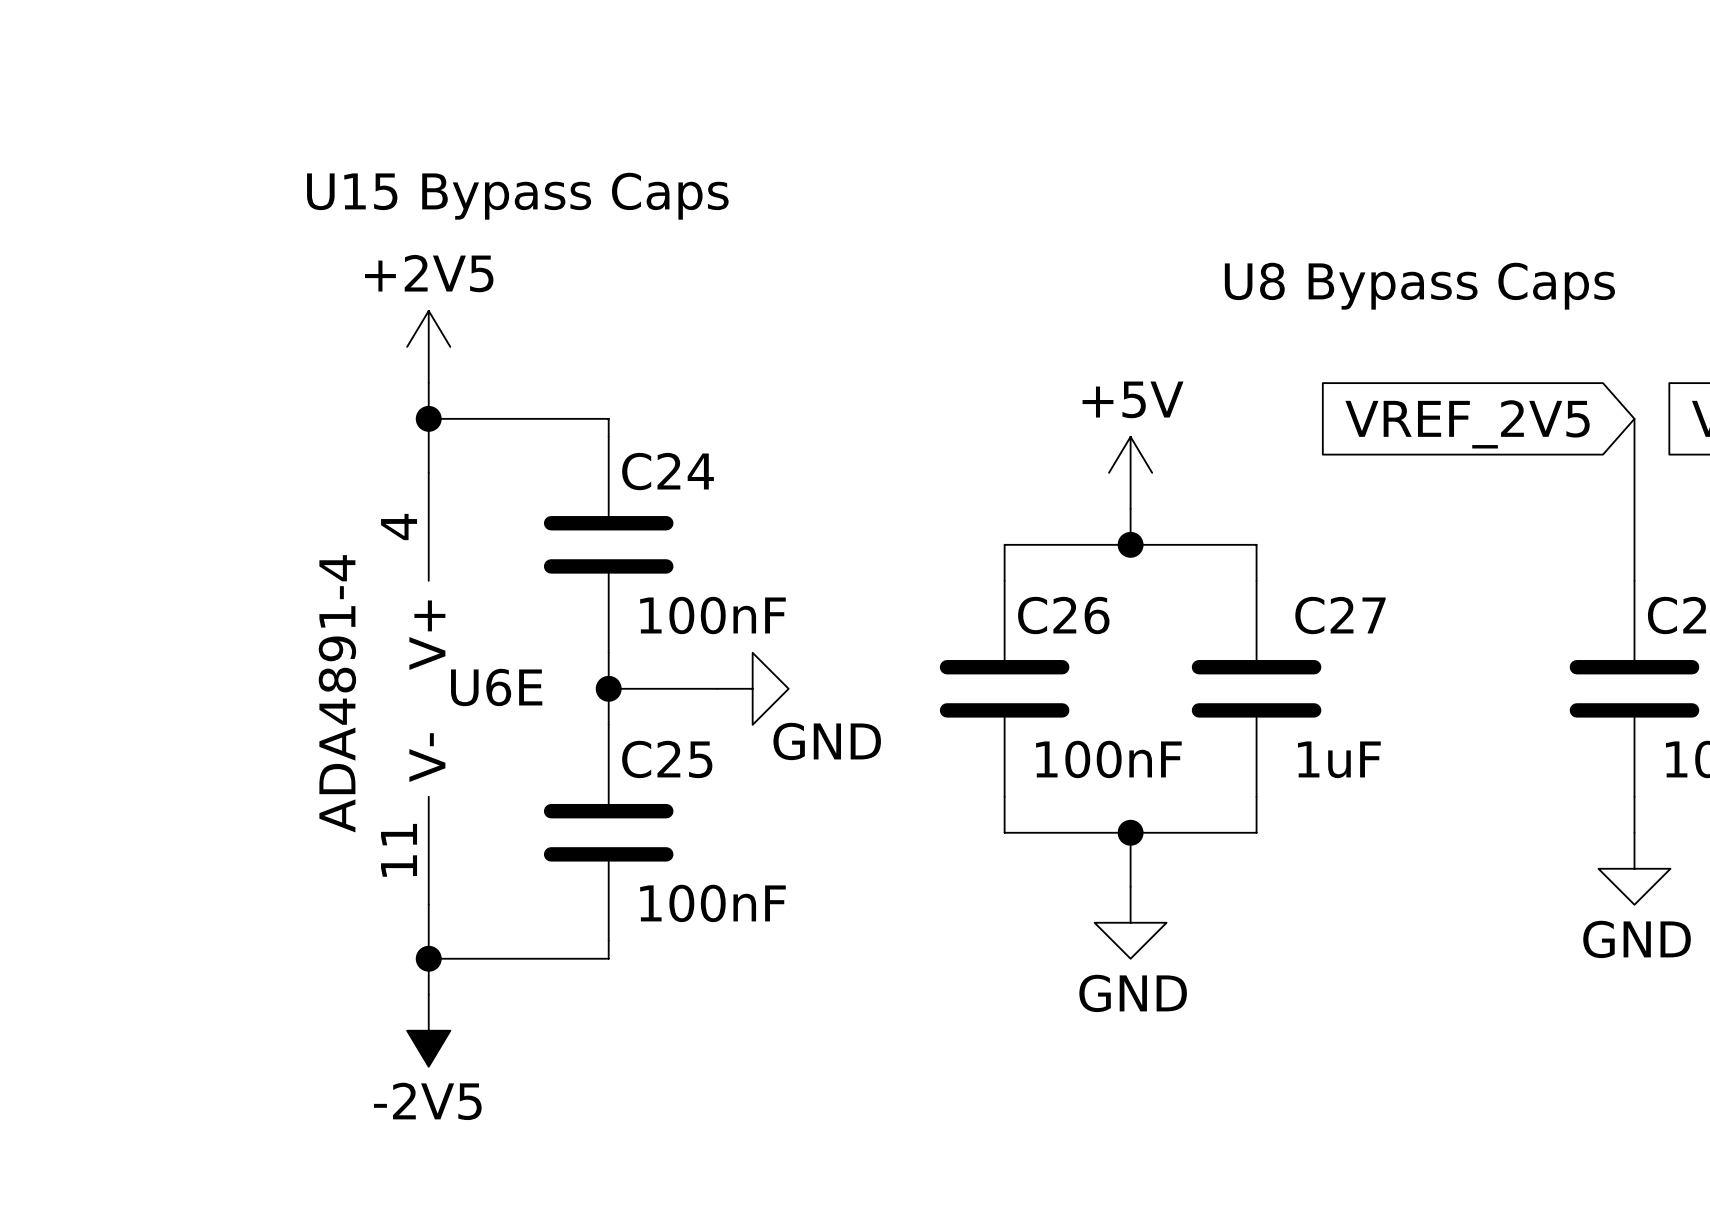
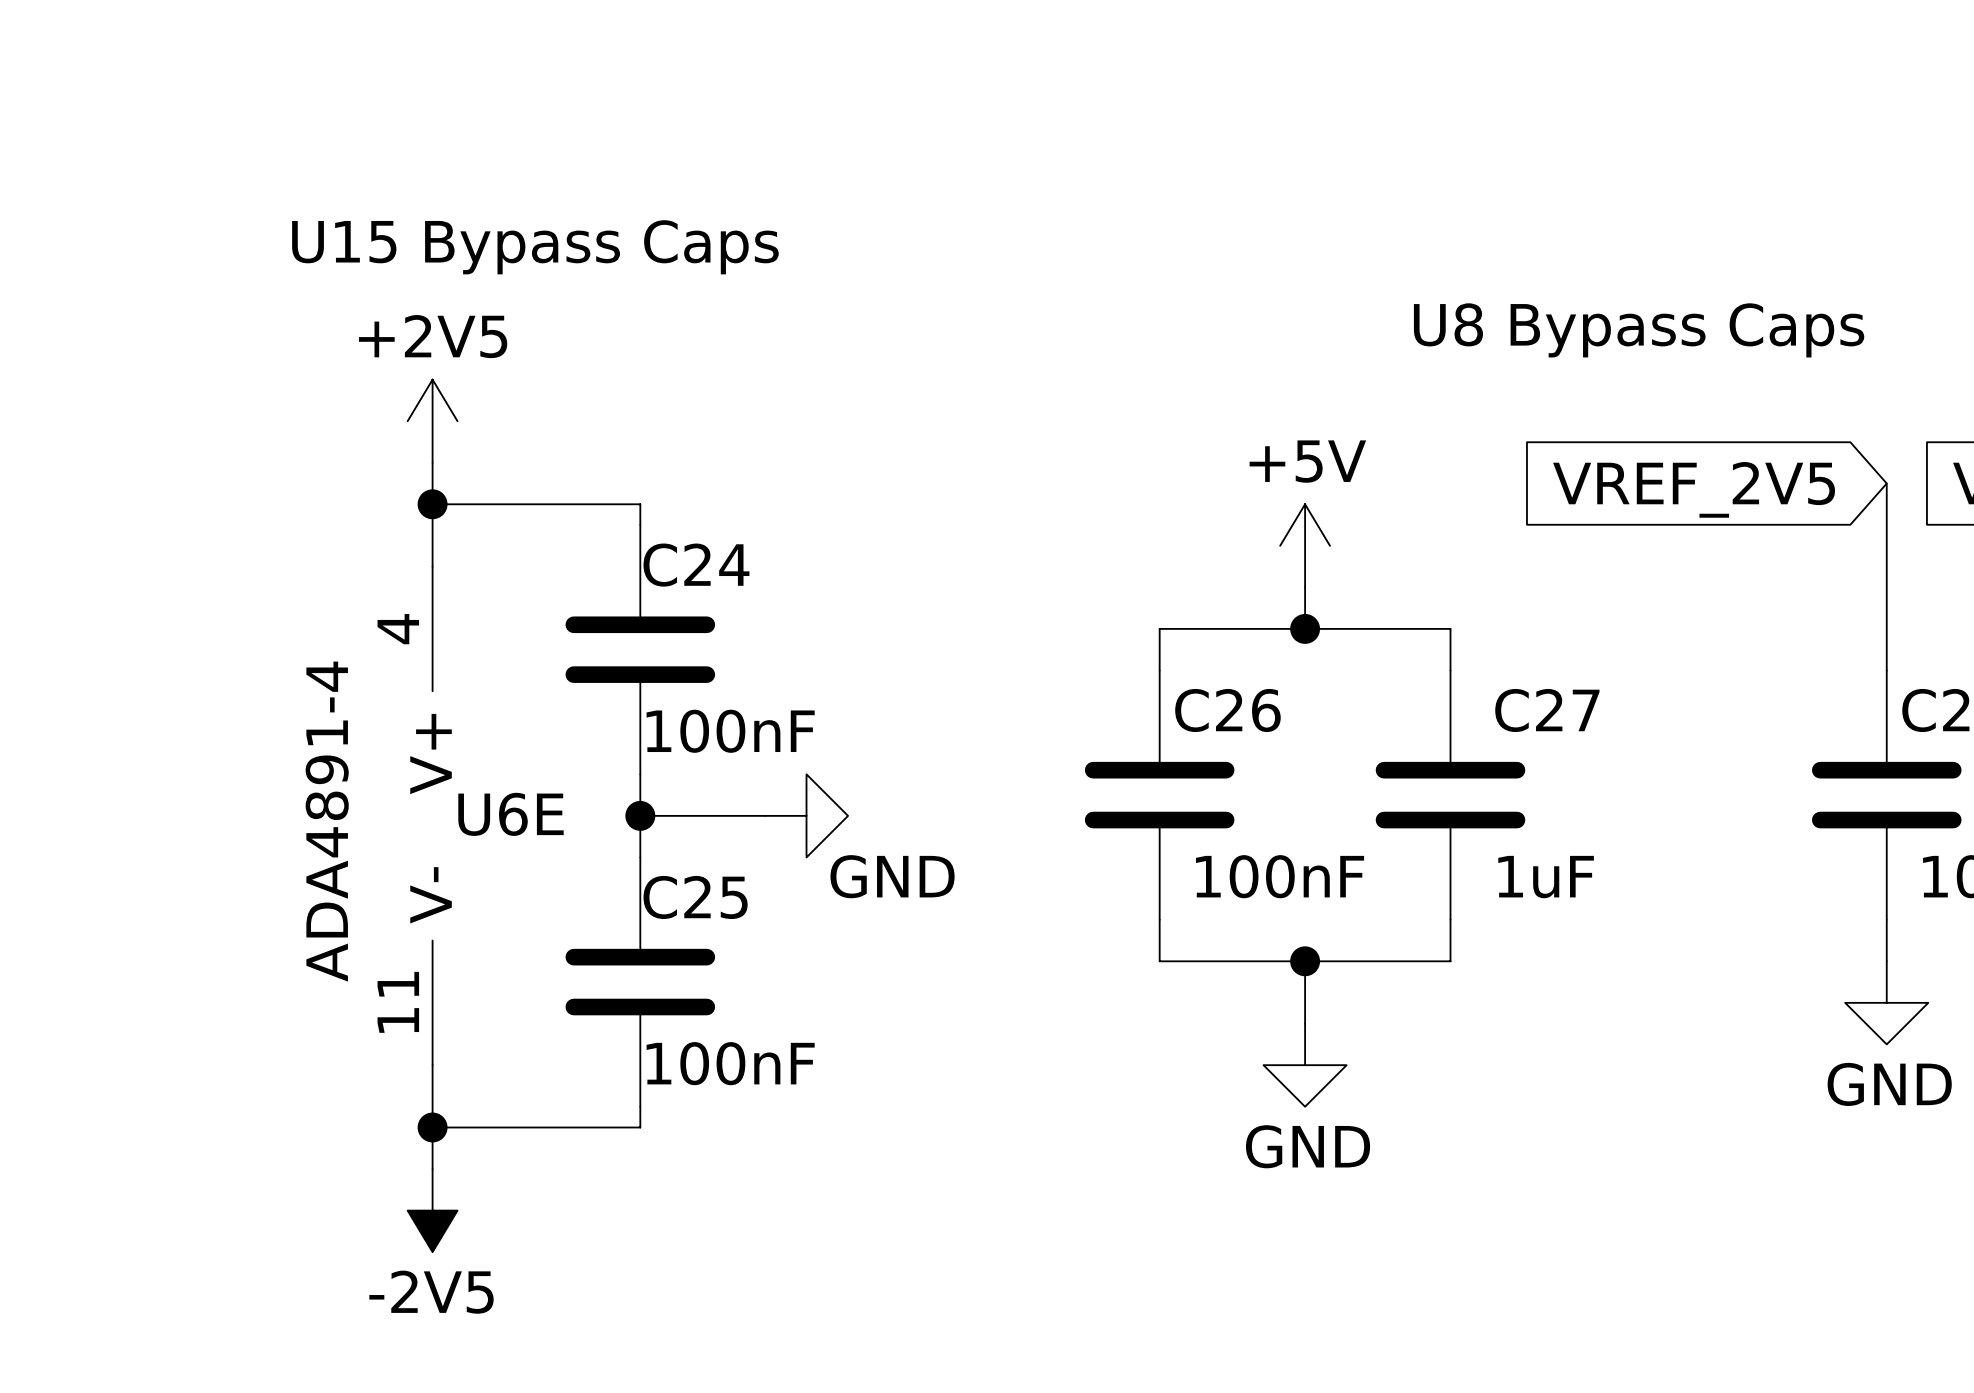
text position: U15 Bypass Caps (517, 196) -> U15 Bypass Caps (535, 247)
power symbol position: +2V5 (428, 346) -> +2V5 (432, 421)
wire: (428, 382) (428, 472) -> (432, 462) (432, 566)
wire: (428, 418) (608, 418) (608, 436) -> (432, 504) (640, 504) (640, 525)
junction position: (428, 418) -> (432, 504)
C24 name position: C24 (668, 471) -> C24 (696, 565)
C24 position: (608, 544) -> (640, 649)
C24 value position: 100nF (712, 615) -> 100nF (730, 731)
wire: (608, 652) (608, 724) -> (640, 774) (640, 857)
U6E position: (428, 688) -> (432, 815)
wire: (608, 688) (716, 688) -> (640, 815) (764, 815)
junction position: (608, 688) -> (640, 815)
power symbol position: GND (752, 688) -> GND (806, 815)
C25 name position: C25 (667, 759) -> C25 (695, 897)
C25 position: (608, 832) -> (640, 982)
C25 value position: 100nF (712, 903) -> 100nF (730, 1063)
wire: (428, 904) (428, 994) -> (432, 1065) (432, 1169)
wire: (608, 940) (608, 958) (428, 958) -> (640, 1106) (640, 1127) (432, 1127)
junction position: (428, 958) -> (432, 1127)
power symbol position: -2V5 (428, 1030) -> -2V5 (432, 1210)

